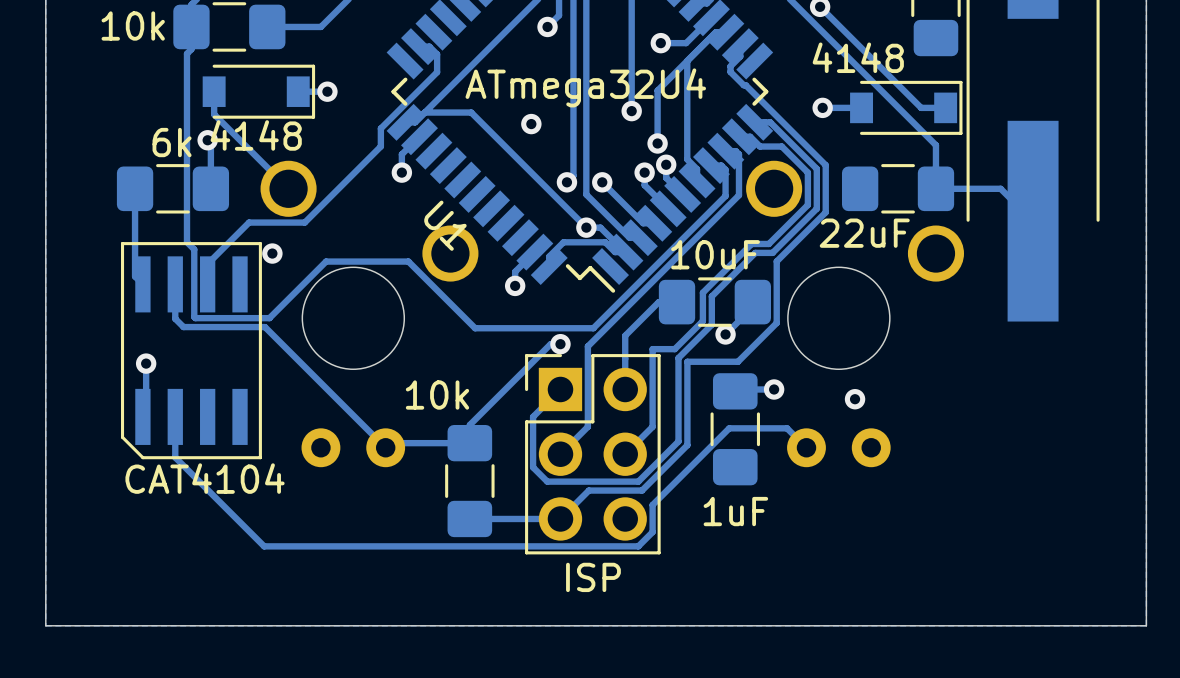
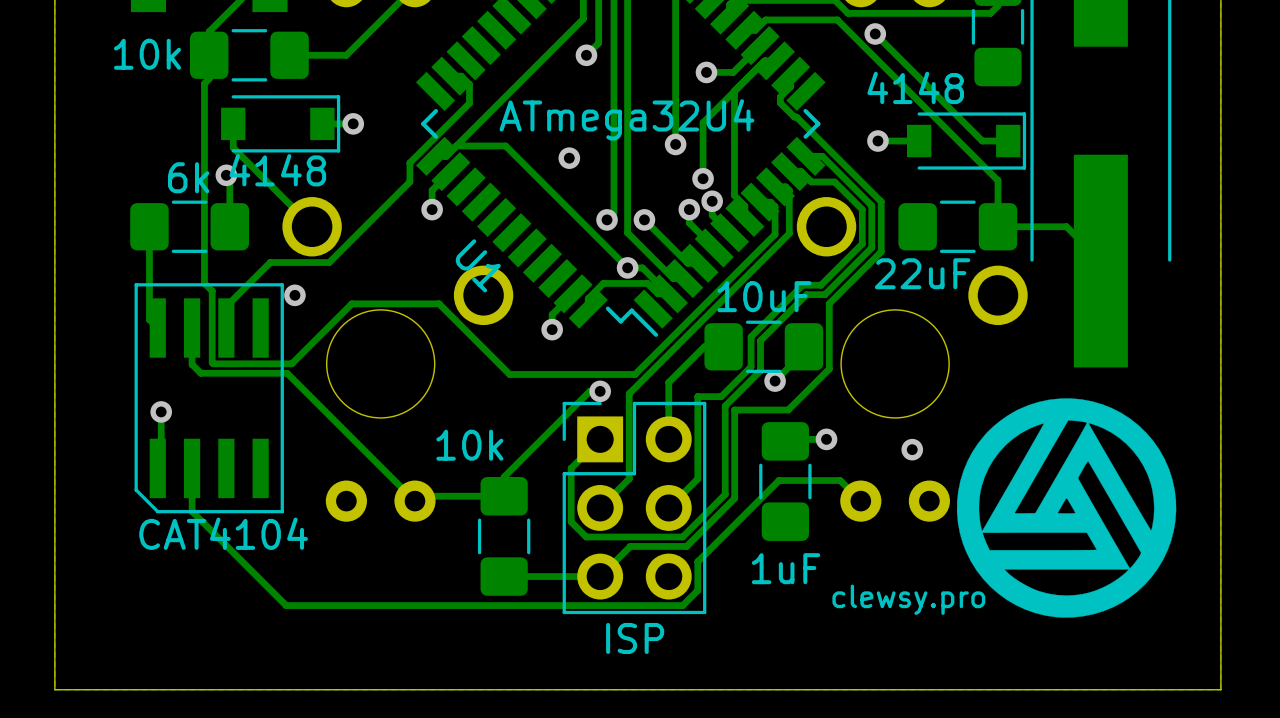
drawing: none -> [956, 398, 1177, 618]
text: none -> clewsy.pro (908, 599)

